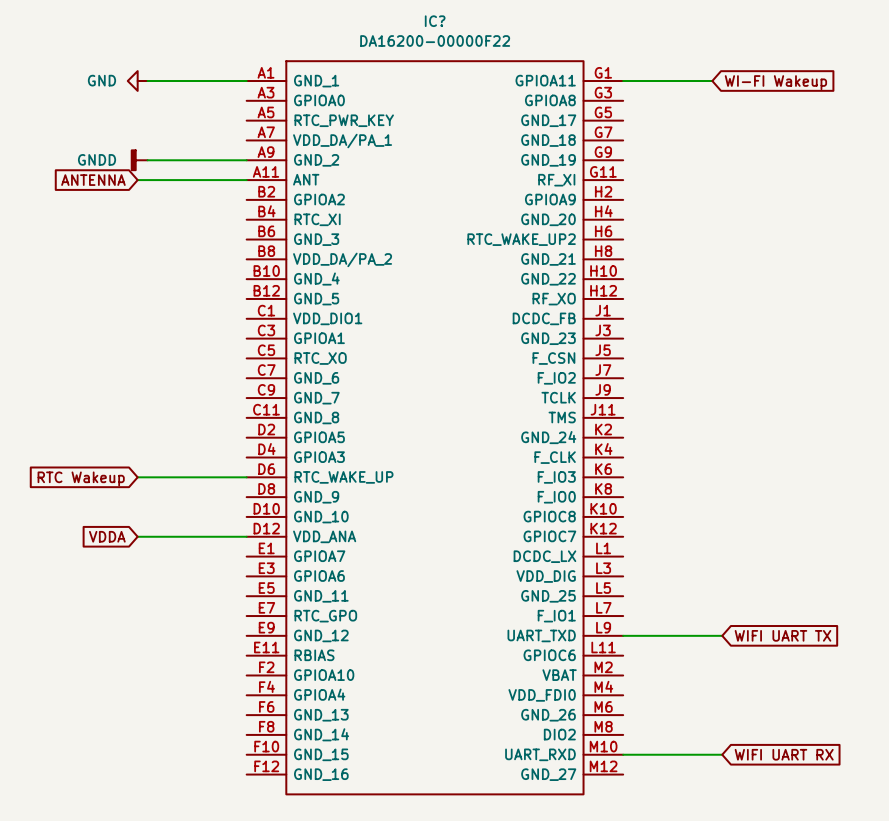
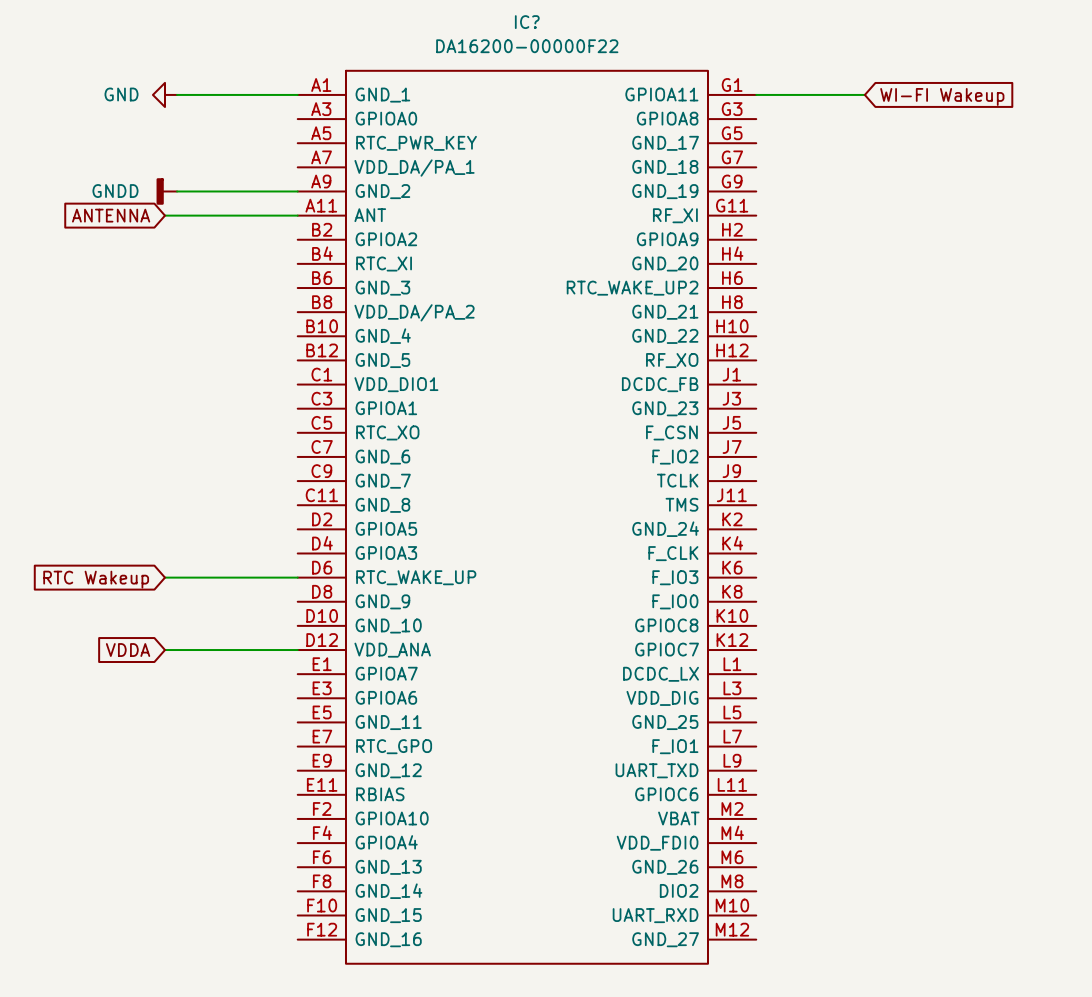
wire: (623, 635) (722, 635) -> none
global label: WIFI UART TX (783, 635) -> none
wire: (623, 754) (722, 754) -> none
global label: WIFI UART RX (784, 754) -> none

